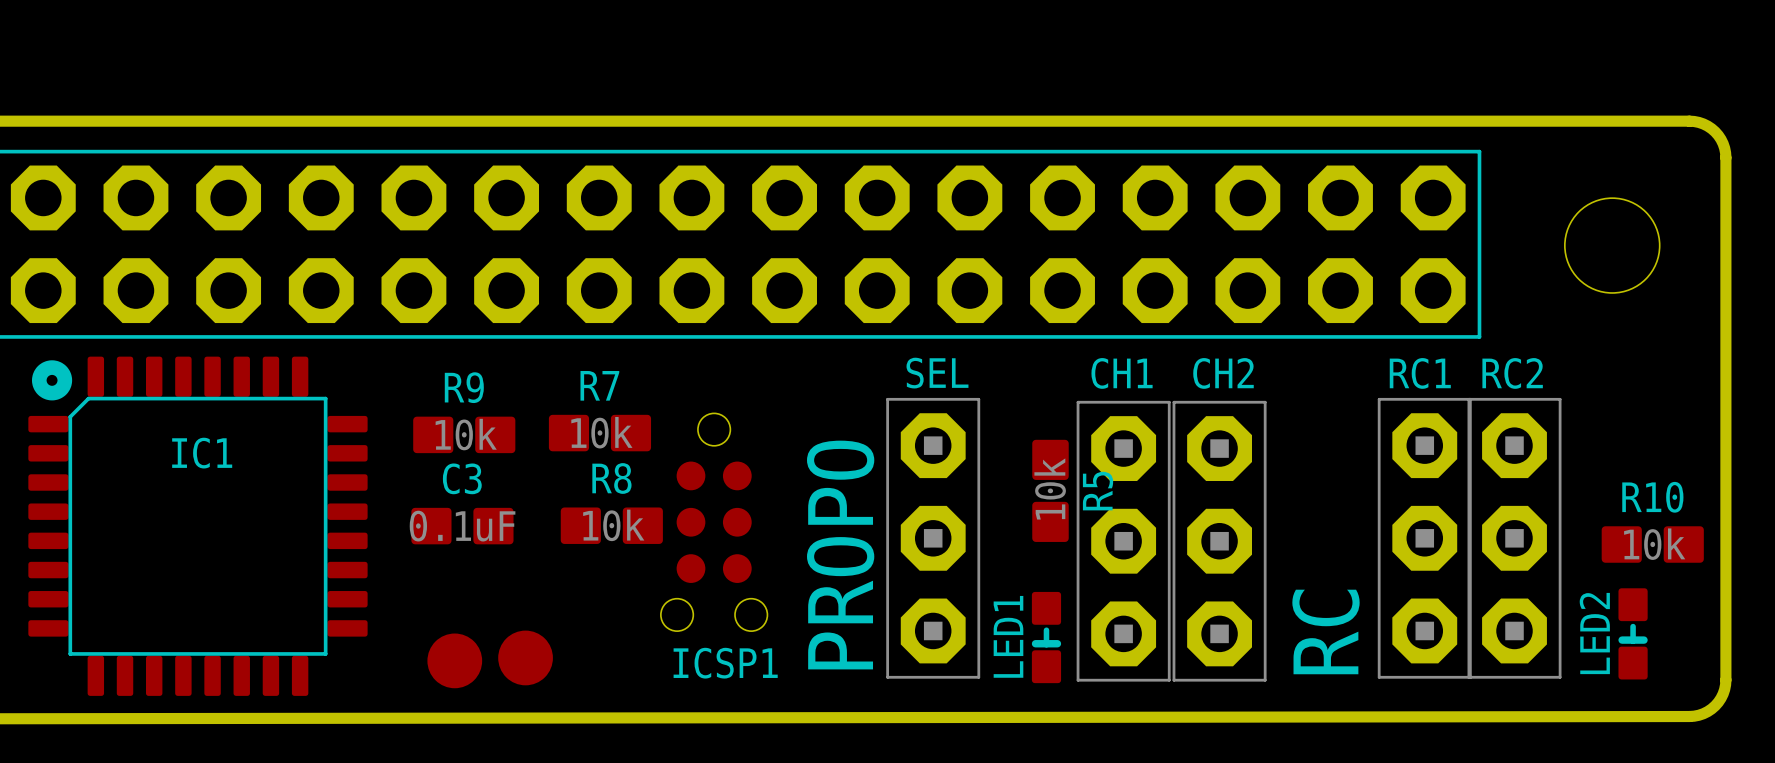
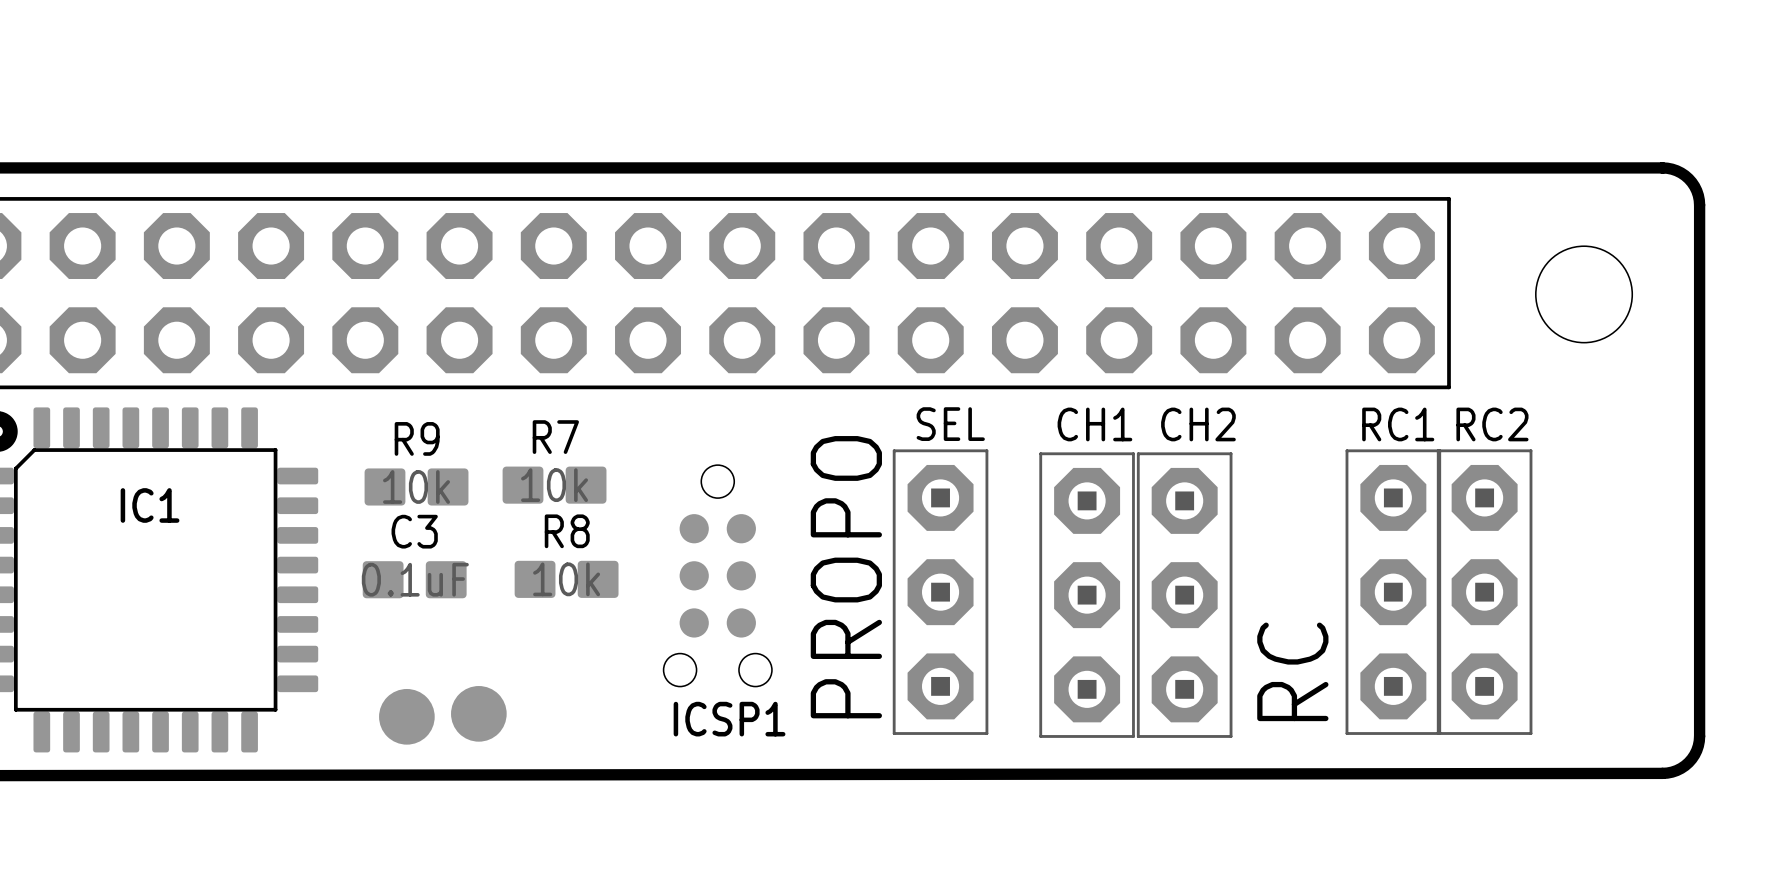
R5: 10k (1050, 490) -> none
ICSP1 position: (714, 522) -> (717, 575)
SEL position: (933, 538) -> (940, 592)
R10: 10k (1652, 544) -> none
text position: PROPO (840, 555) -> PROPO (846, 577)
LED2: (1633, 633) -> none
LED1: (1046, 637) -> none

